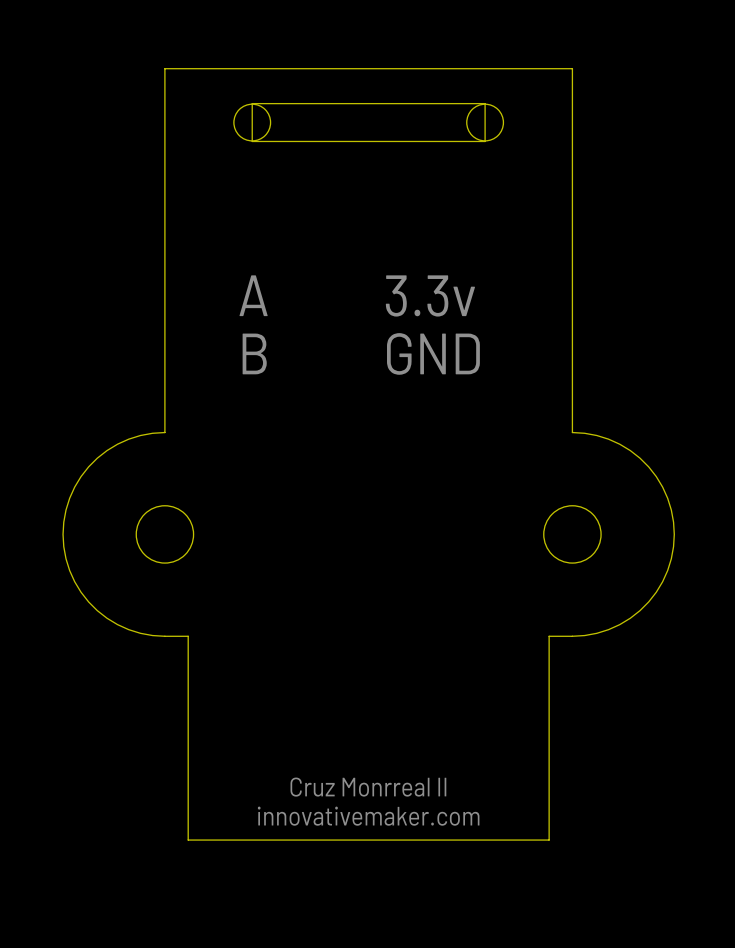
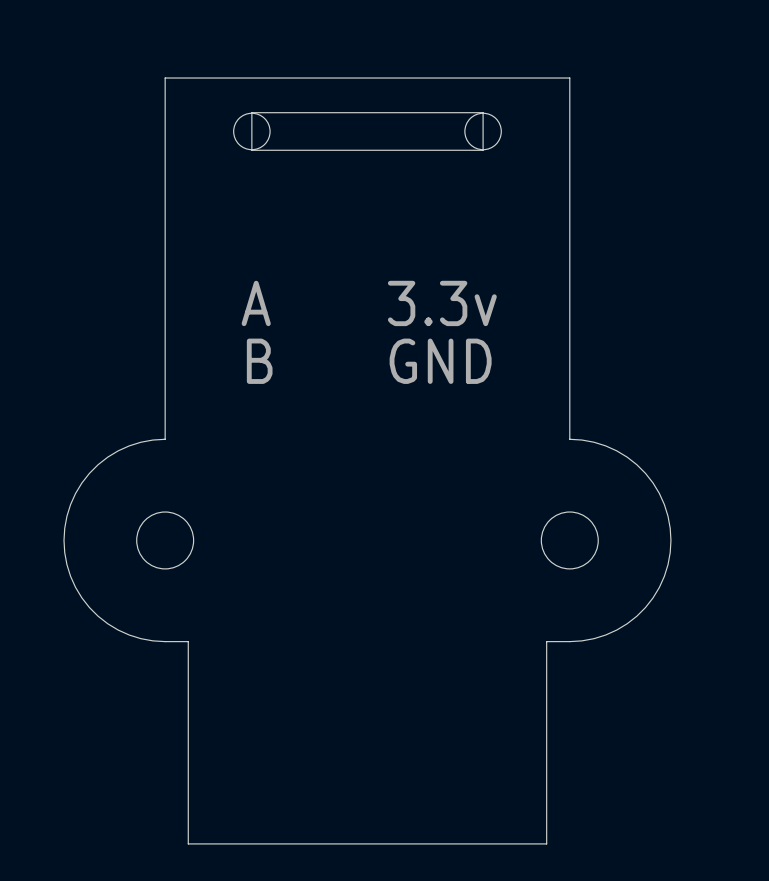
text: Cruz Monrreal II (368, 787) -> none
text: innovativemaker.com (368, 816) -> none

